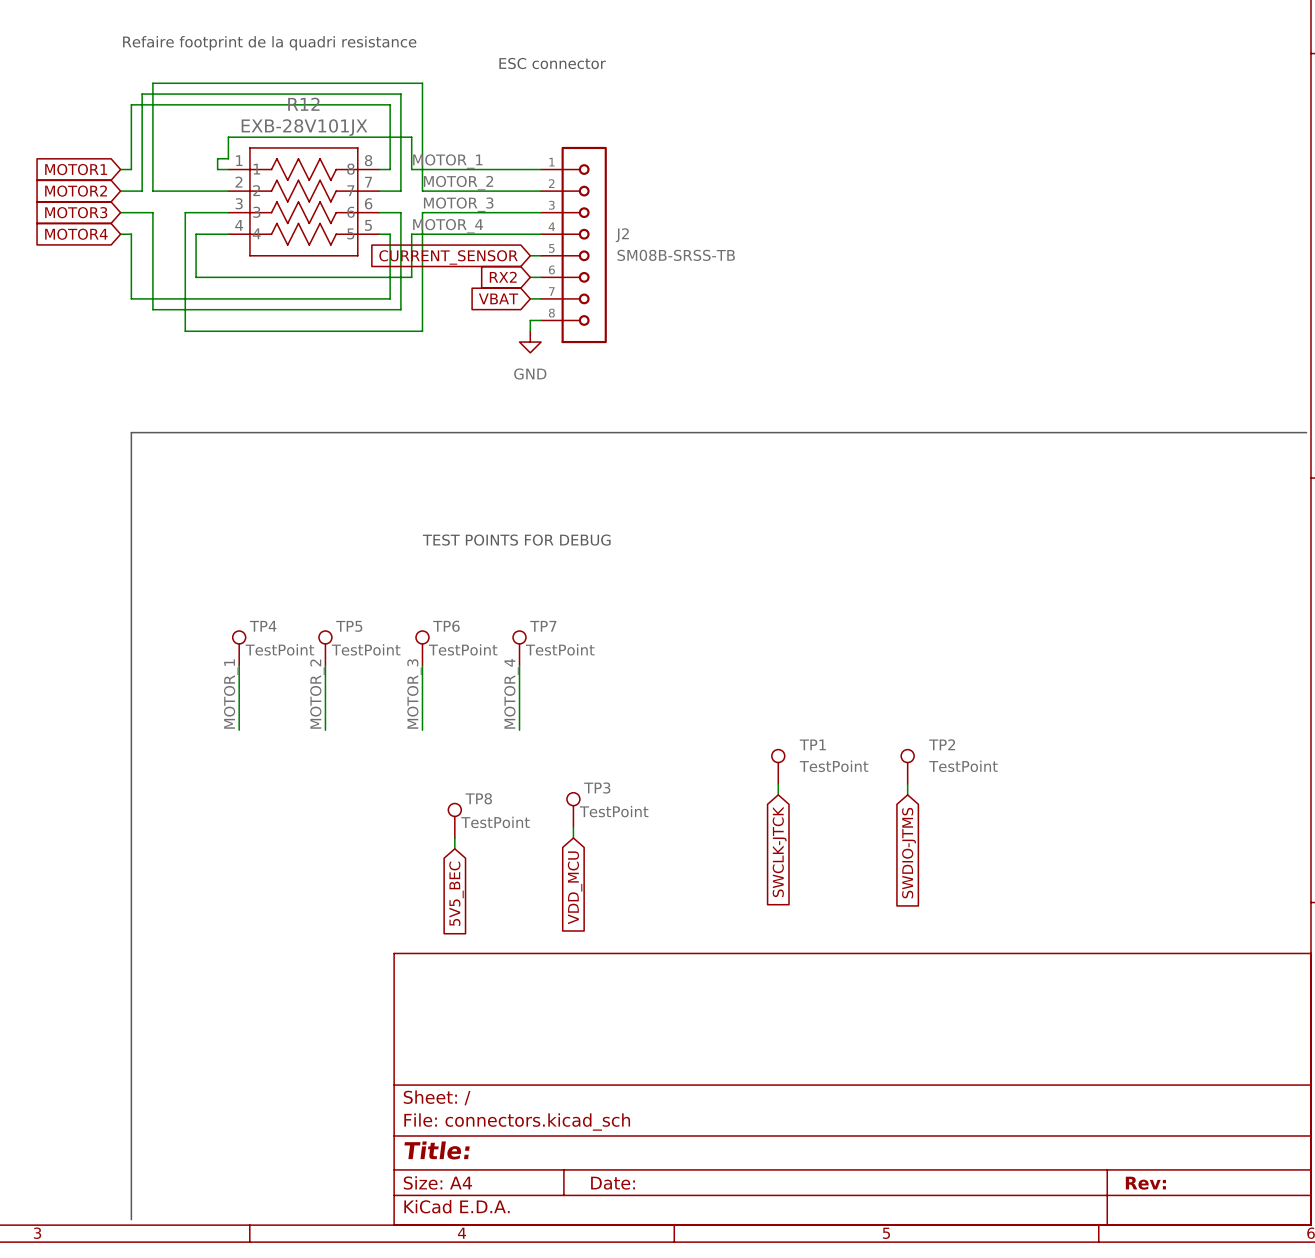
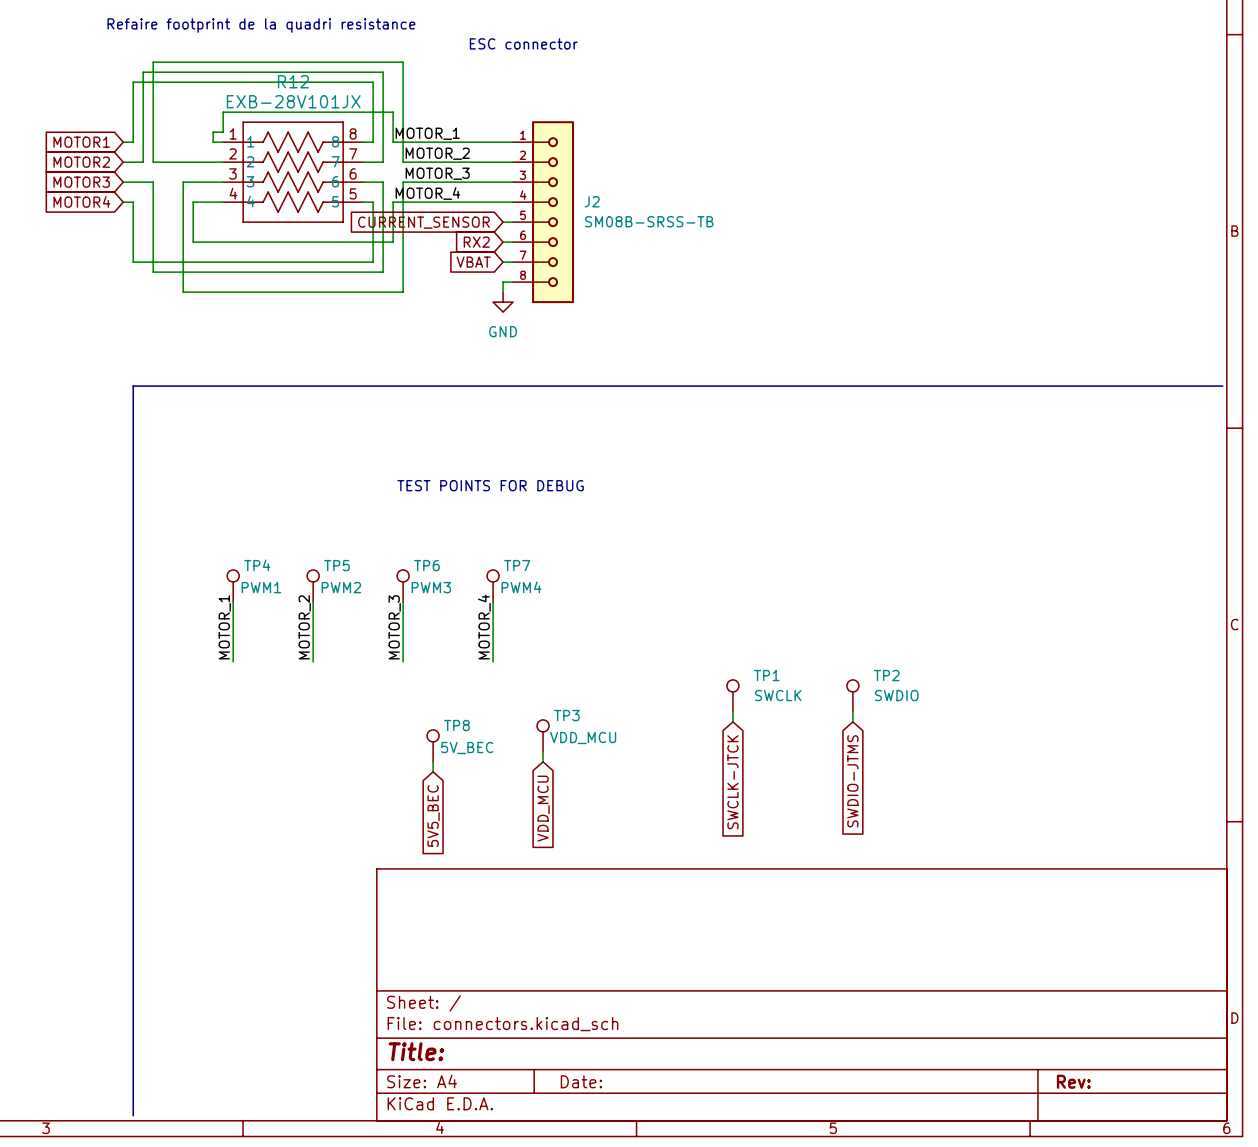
TP4 value: TestPoint (279, 649) -> PWM1 (261, 587)
TP5 value: TestPoint (366, 649) -> PWM2 (341, 587)
TP6 value: TestPoint (463, 649) -> PWM3 (431, 587)
TP7 value: TestPoint (560, 649) -> PWM4 (521, 587)
TP1 value: TestPoint (834, 766) -> SWCLK (778, 695)
TP2 value: TestPoint (963, 766) -> SWDIO (896, 695)
TP3 value: TestPoint (614, 811) -> VDD_MCU (583, 738)
TP8 value: TestPoint (495, 822) -> 5V_BEC (467, 748)

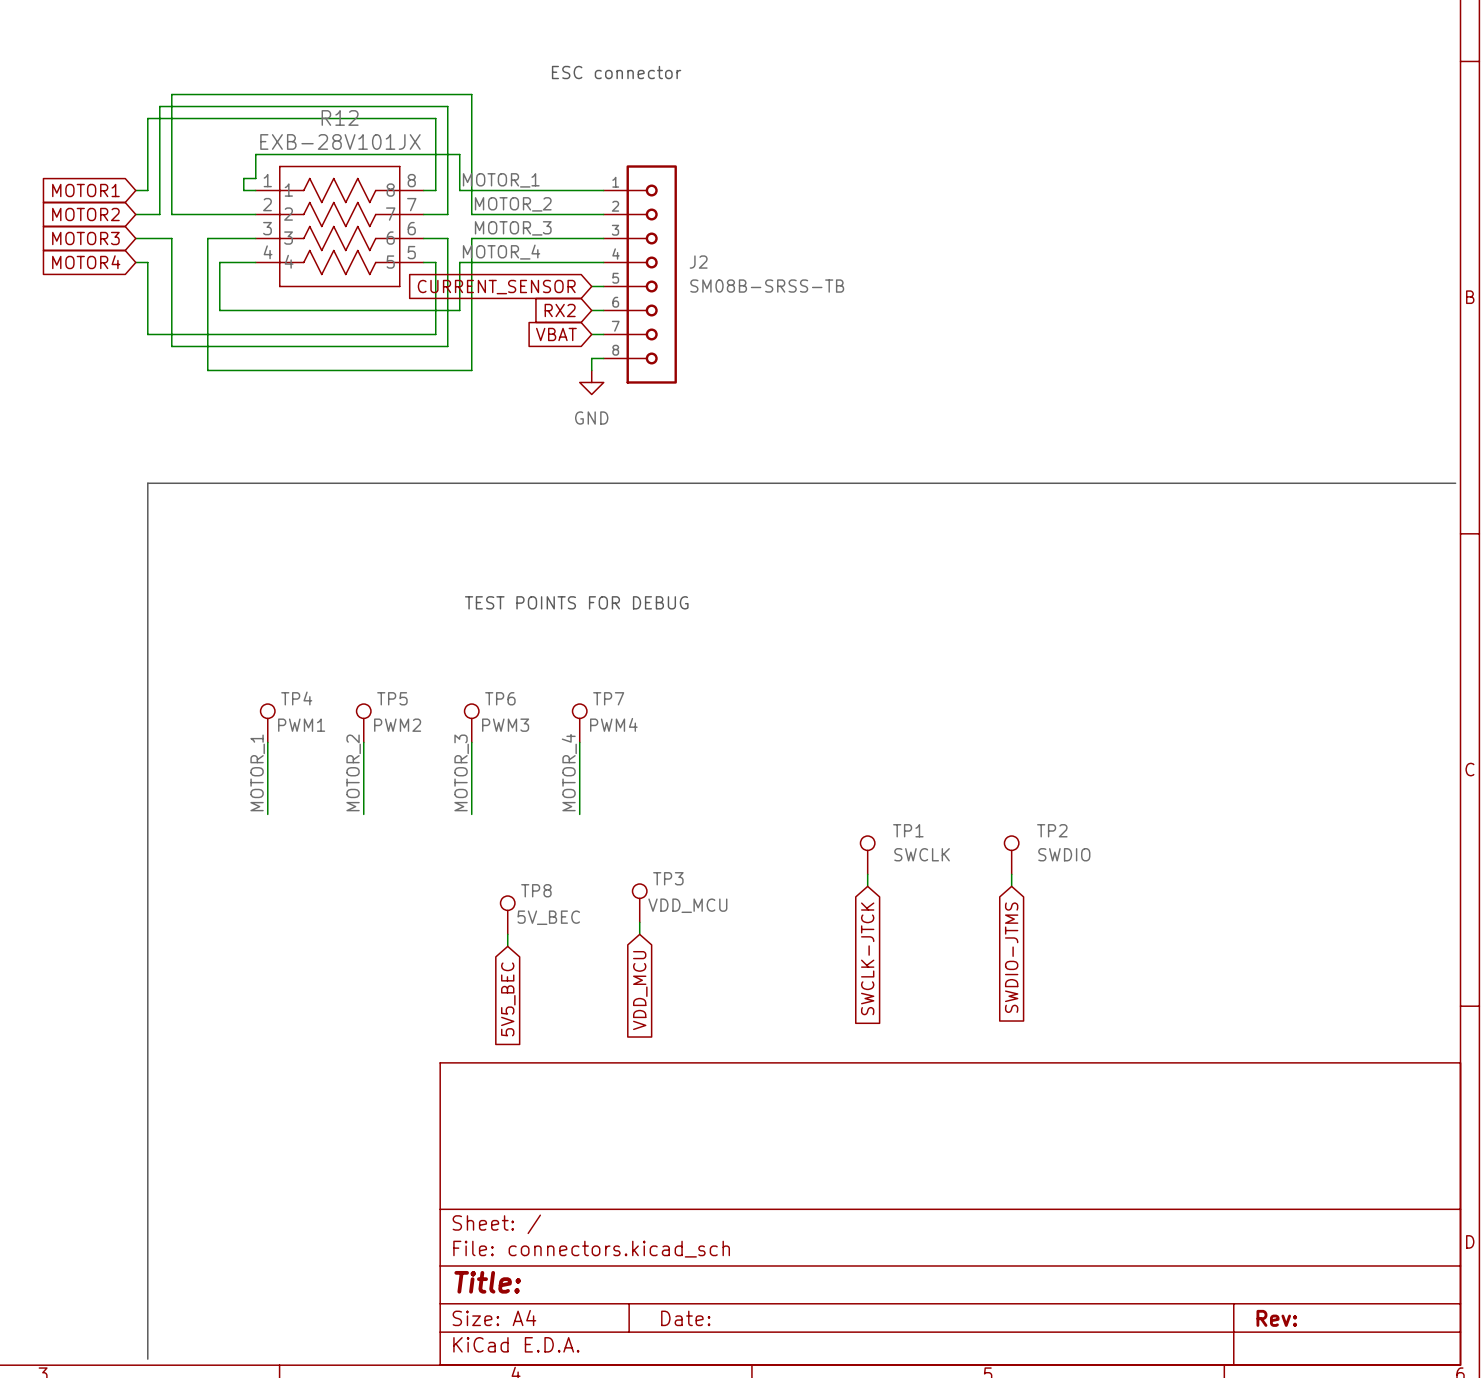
text: Refaire footprint de la quadri resistance (261, 25) -> none

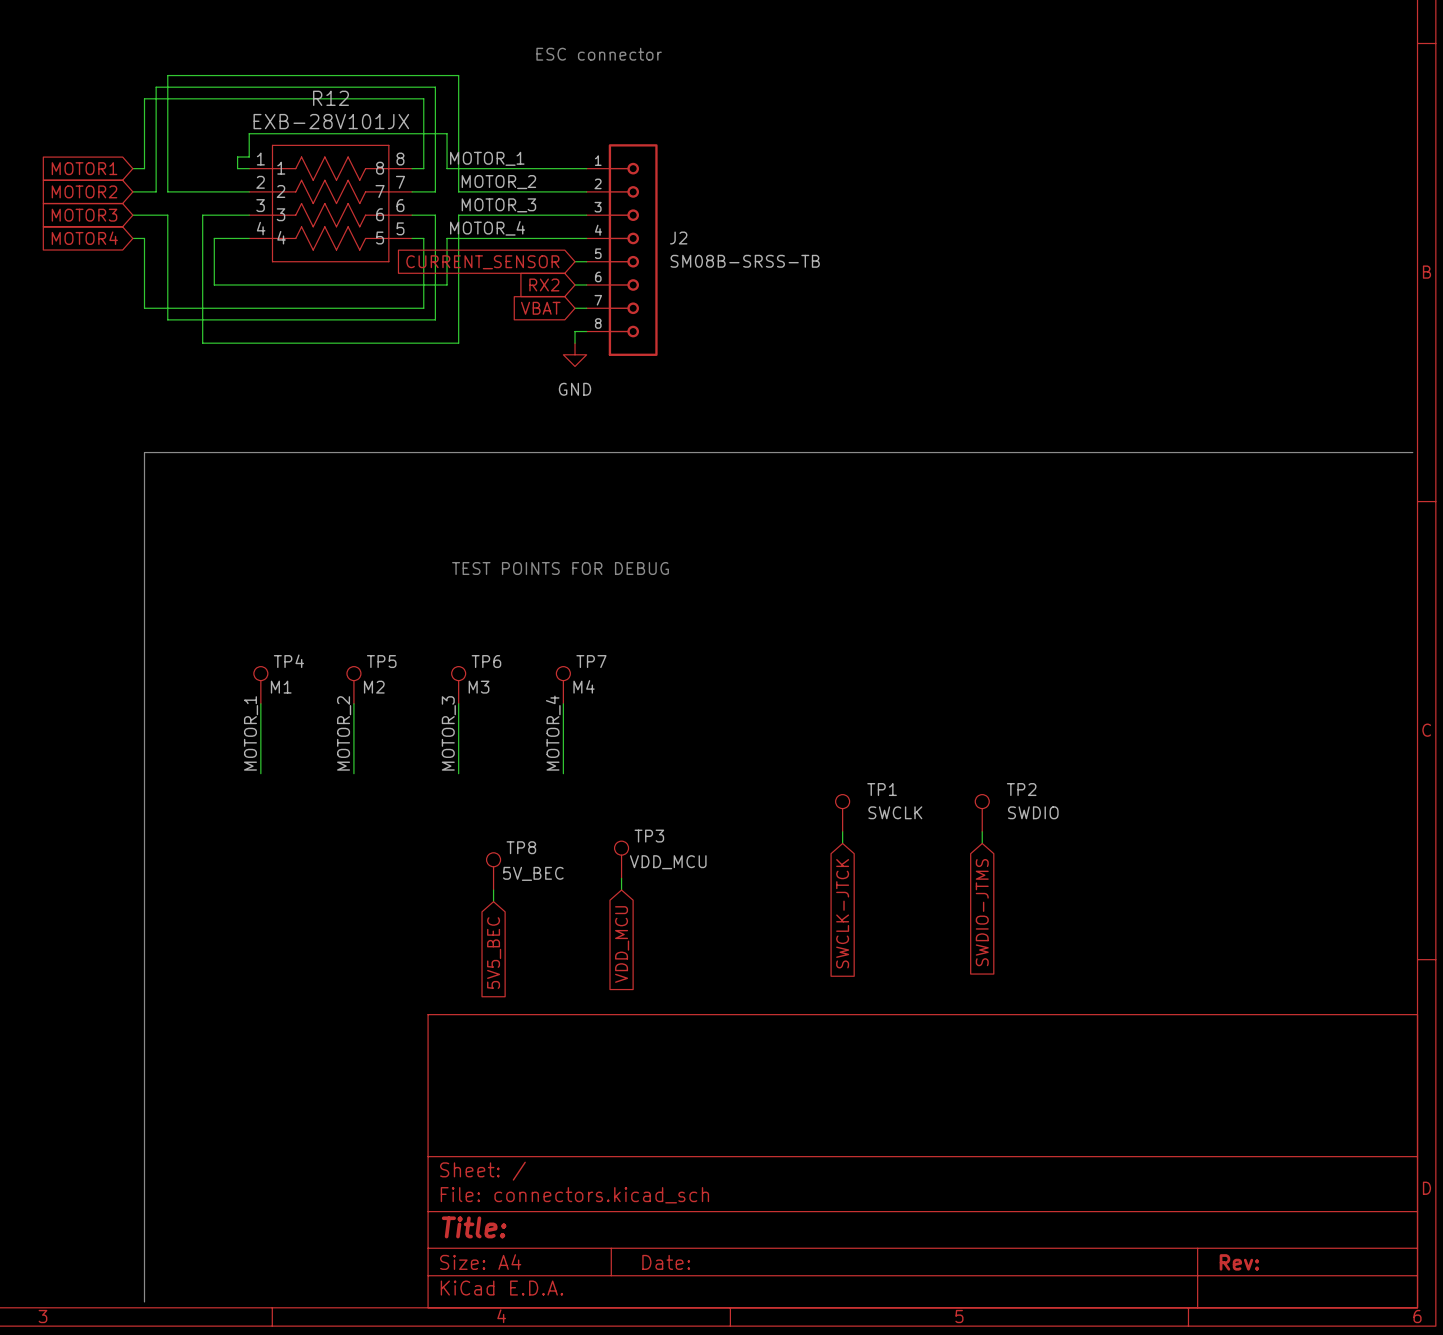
TP7 value: PWM4 (613, 724) -> M4 (584, 686)
TP4 value: PWM1 (301, 725) -> M1 (281, 687)
TP5 value: PWM2 (397, 725) -> M2 (374, 687)
TP6 value: PWM3 (505, 725) -> M3 (479, 687)

